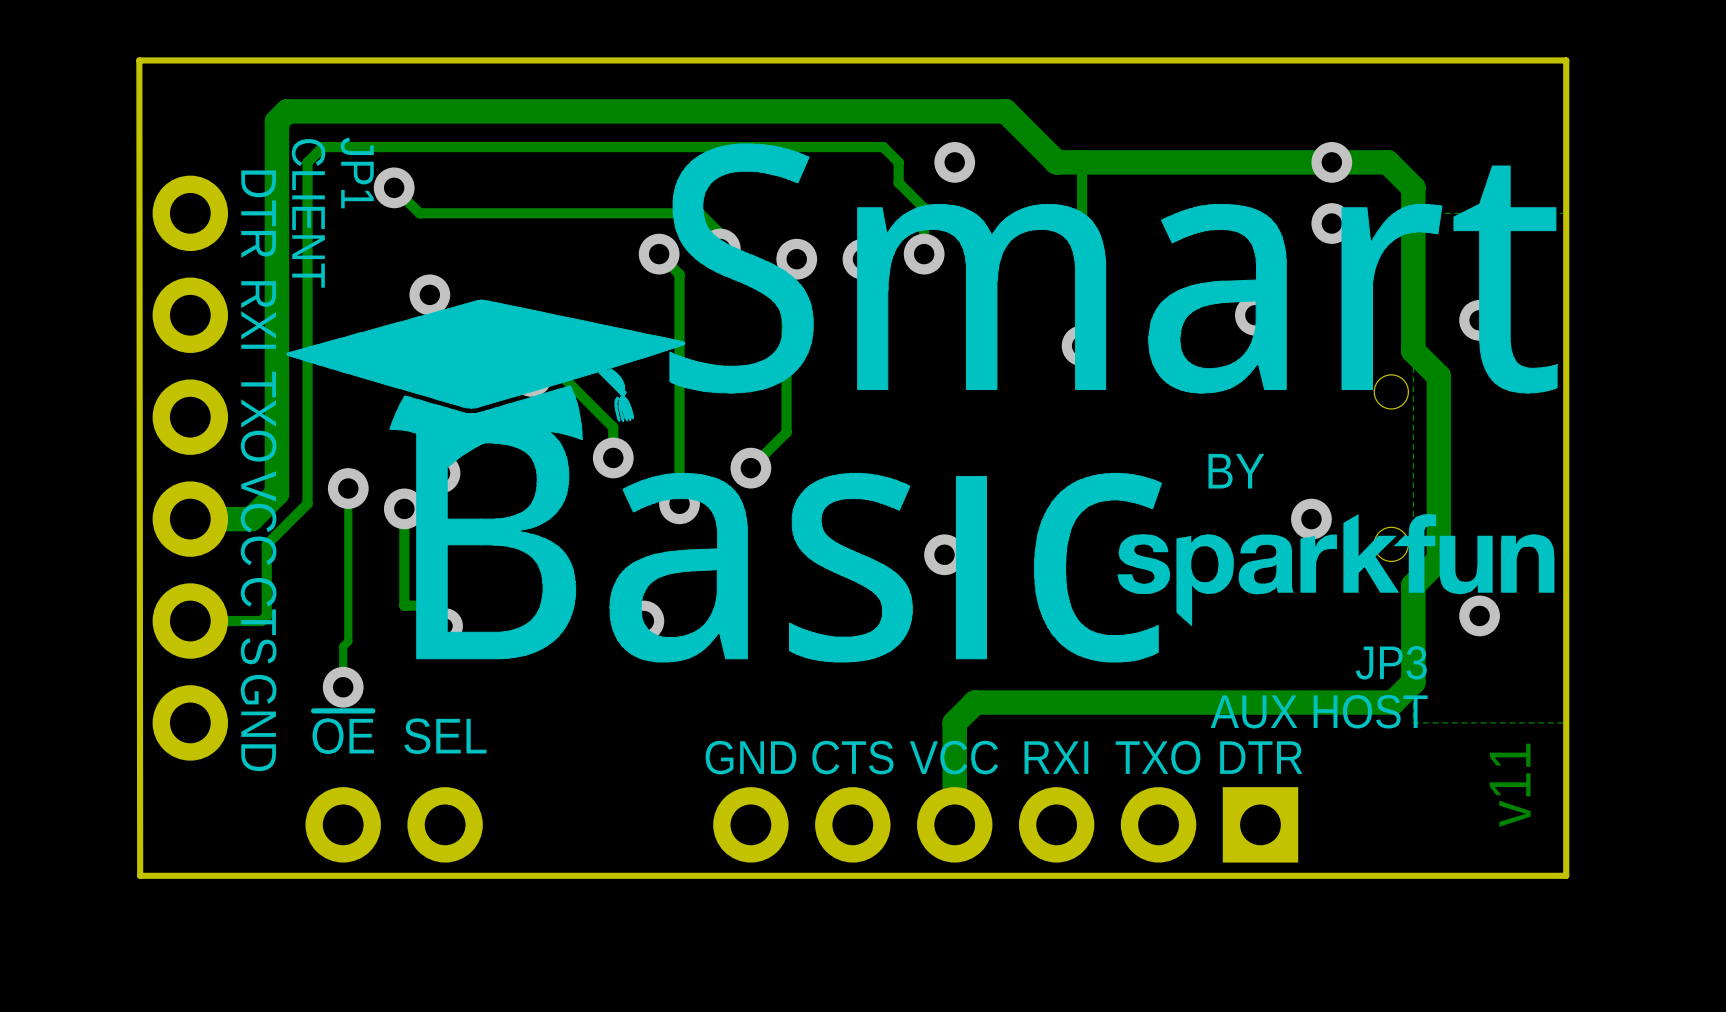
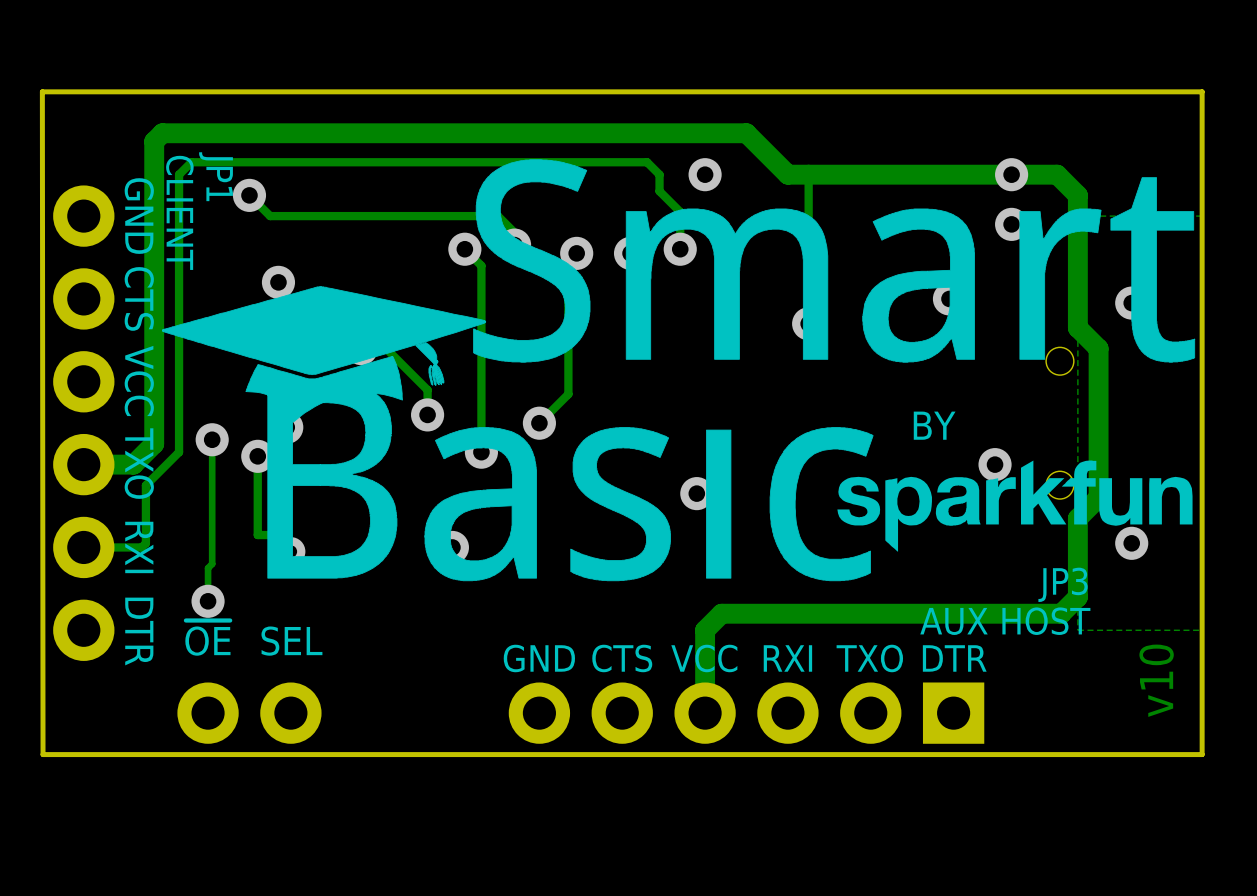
text: DTR (258, 214) -> GND (139, 216)
text: RXI (258, 315) -> CTS (139, 298)
text: TXO (258, 416) -> VCC (139, 380)
text: VCC (258, 518) -> TXO (139, 463)
text: CTS (258, 621) -> RXI (139, 547)
text: GND (258, 722) -> DTR (139, 631)
text: v11 (1510, 785) -> v10 (1156, 680)

